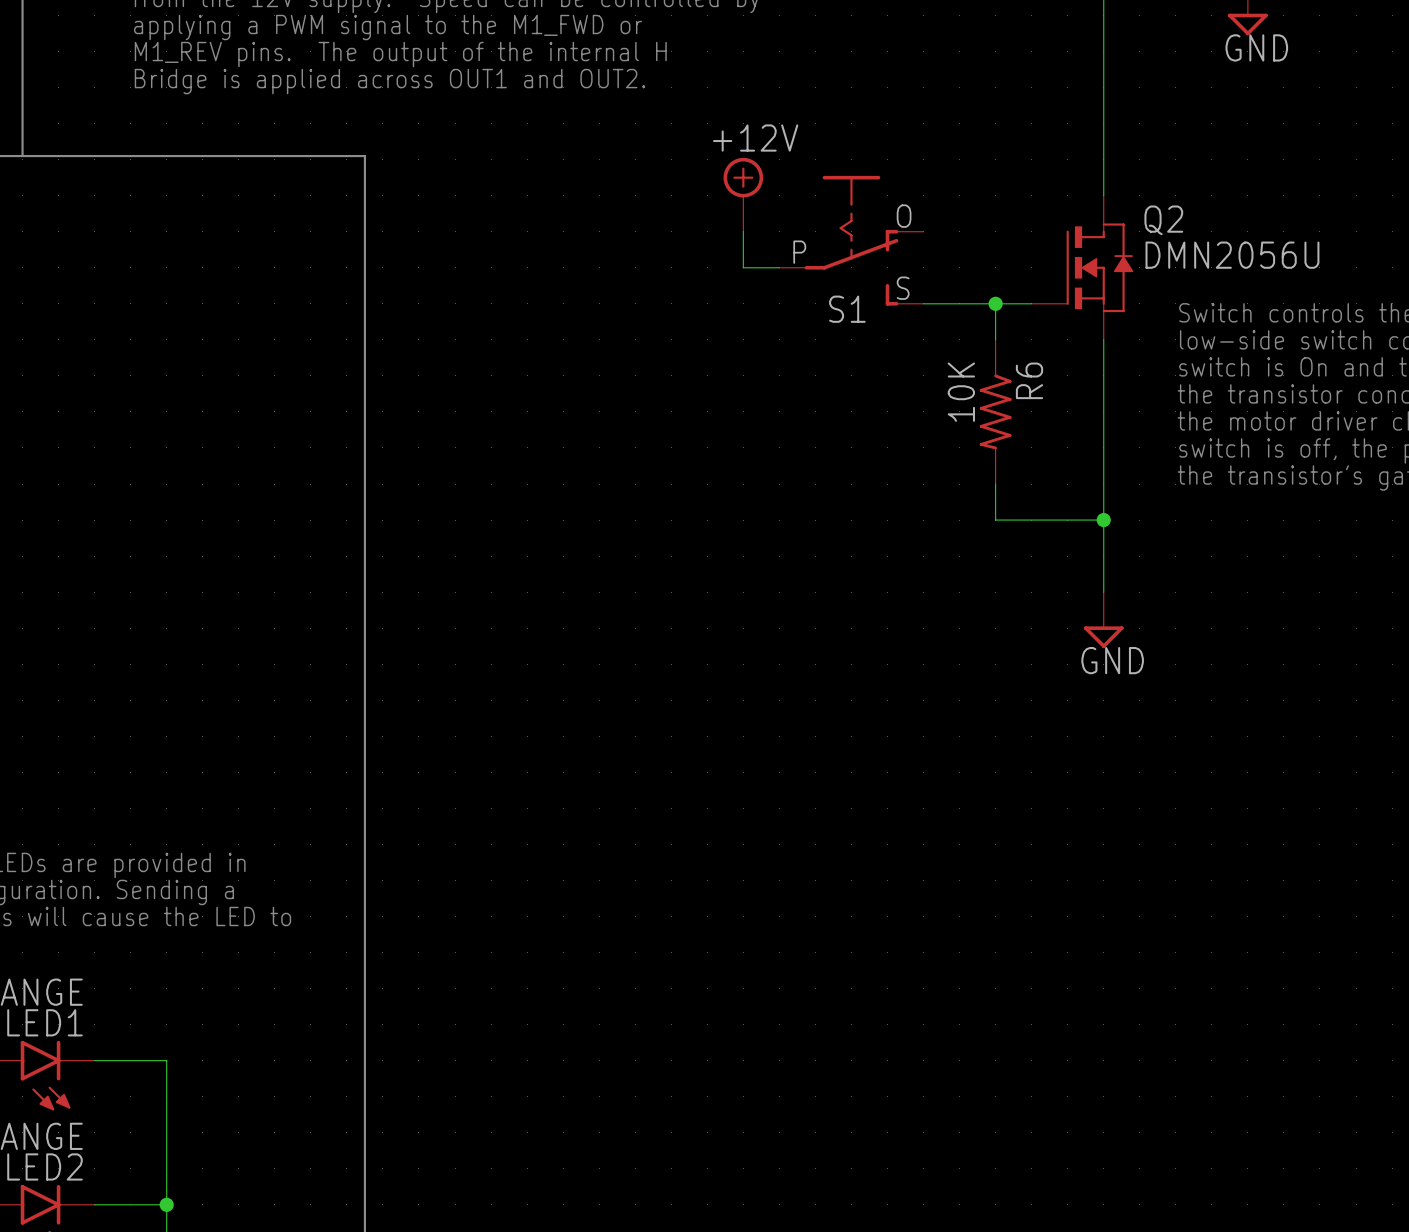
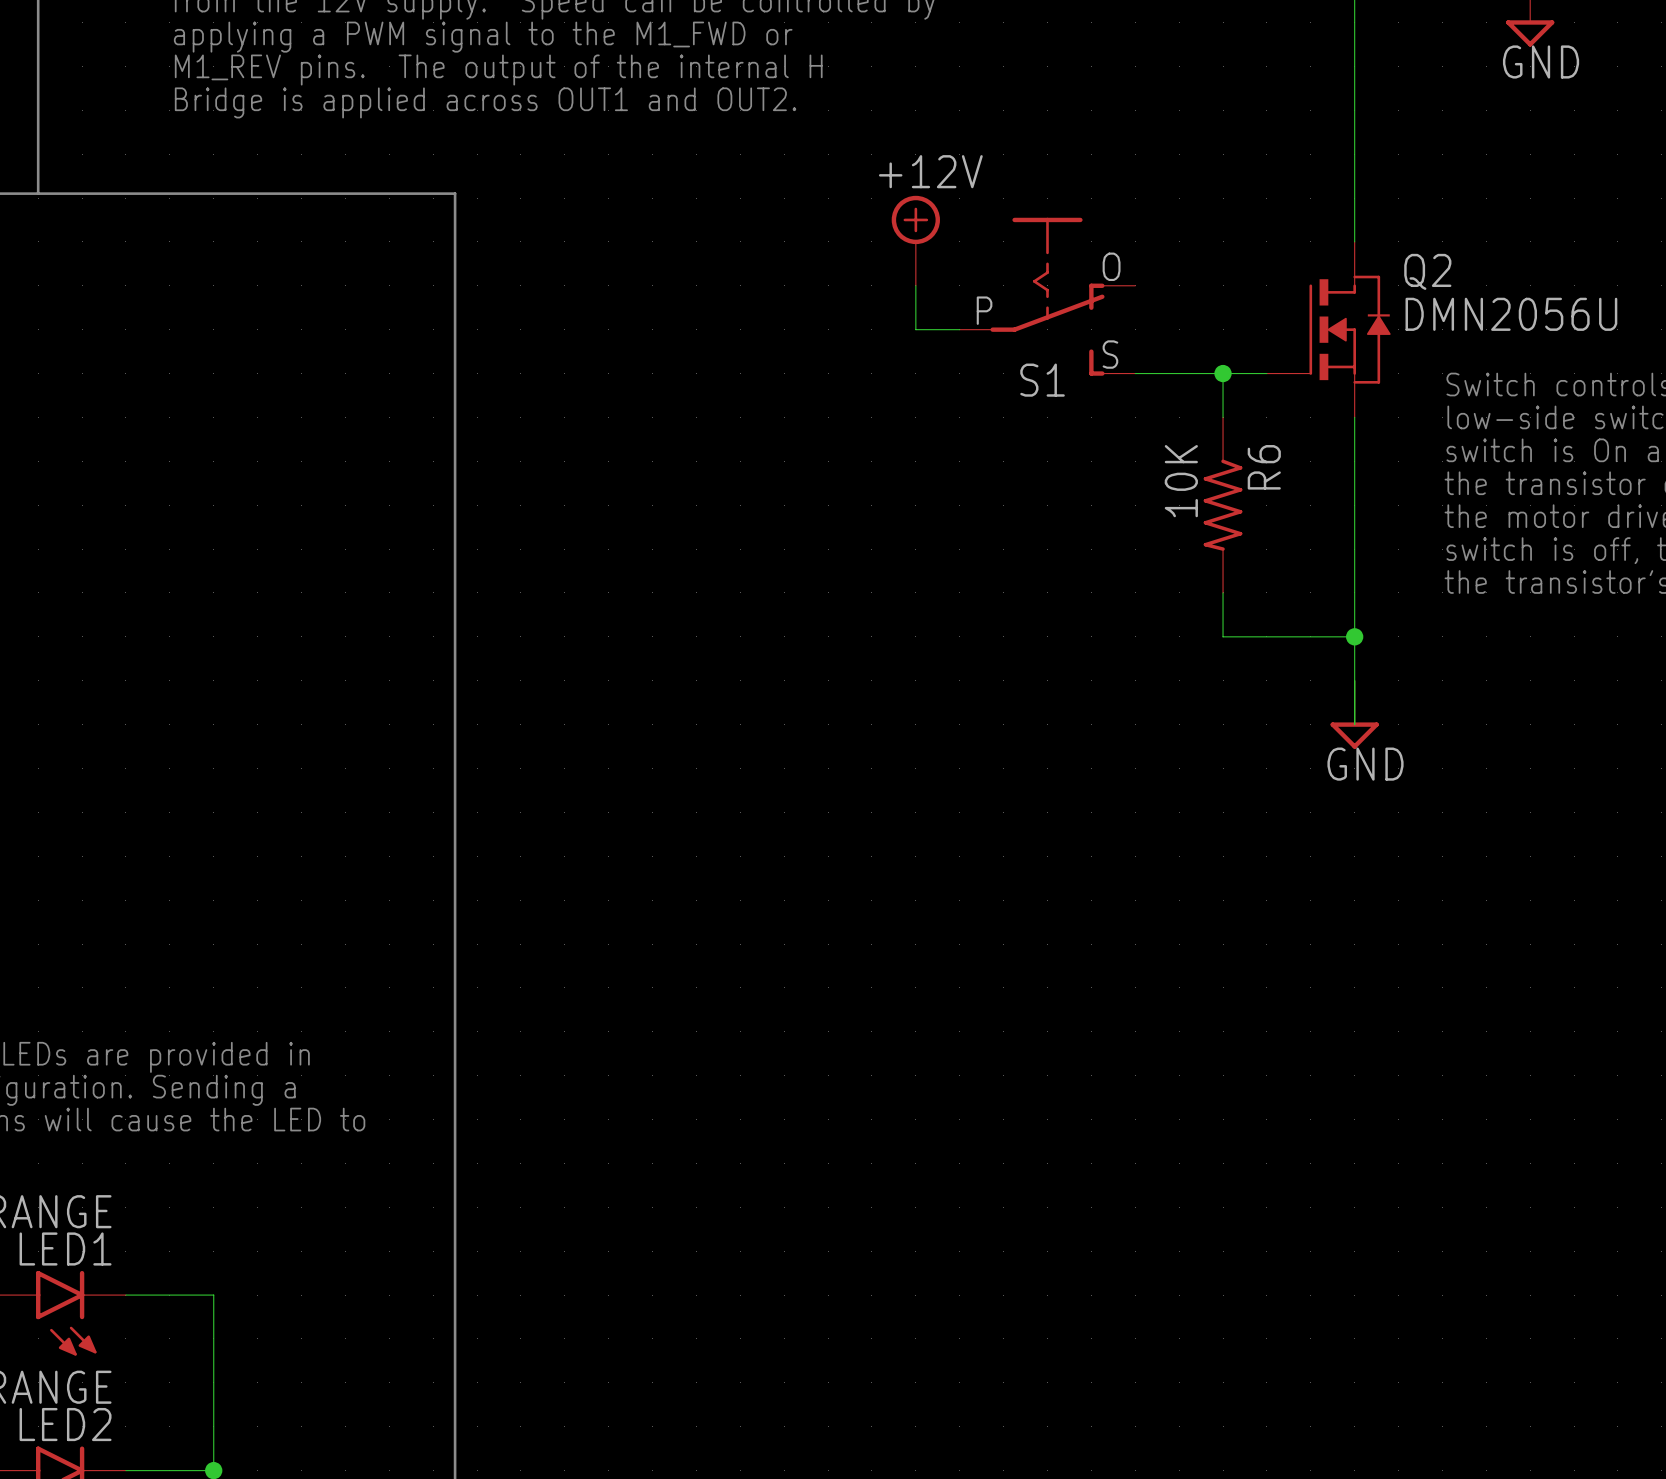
power symbol position: GND (1103, 620) -> GND (1354, 714)

